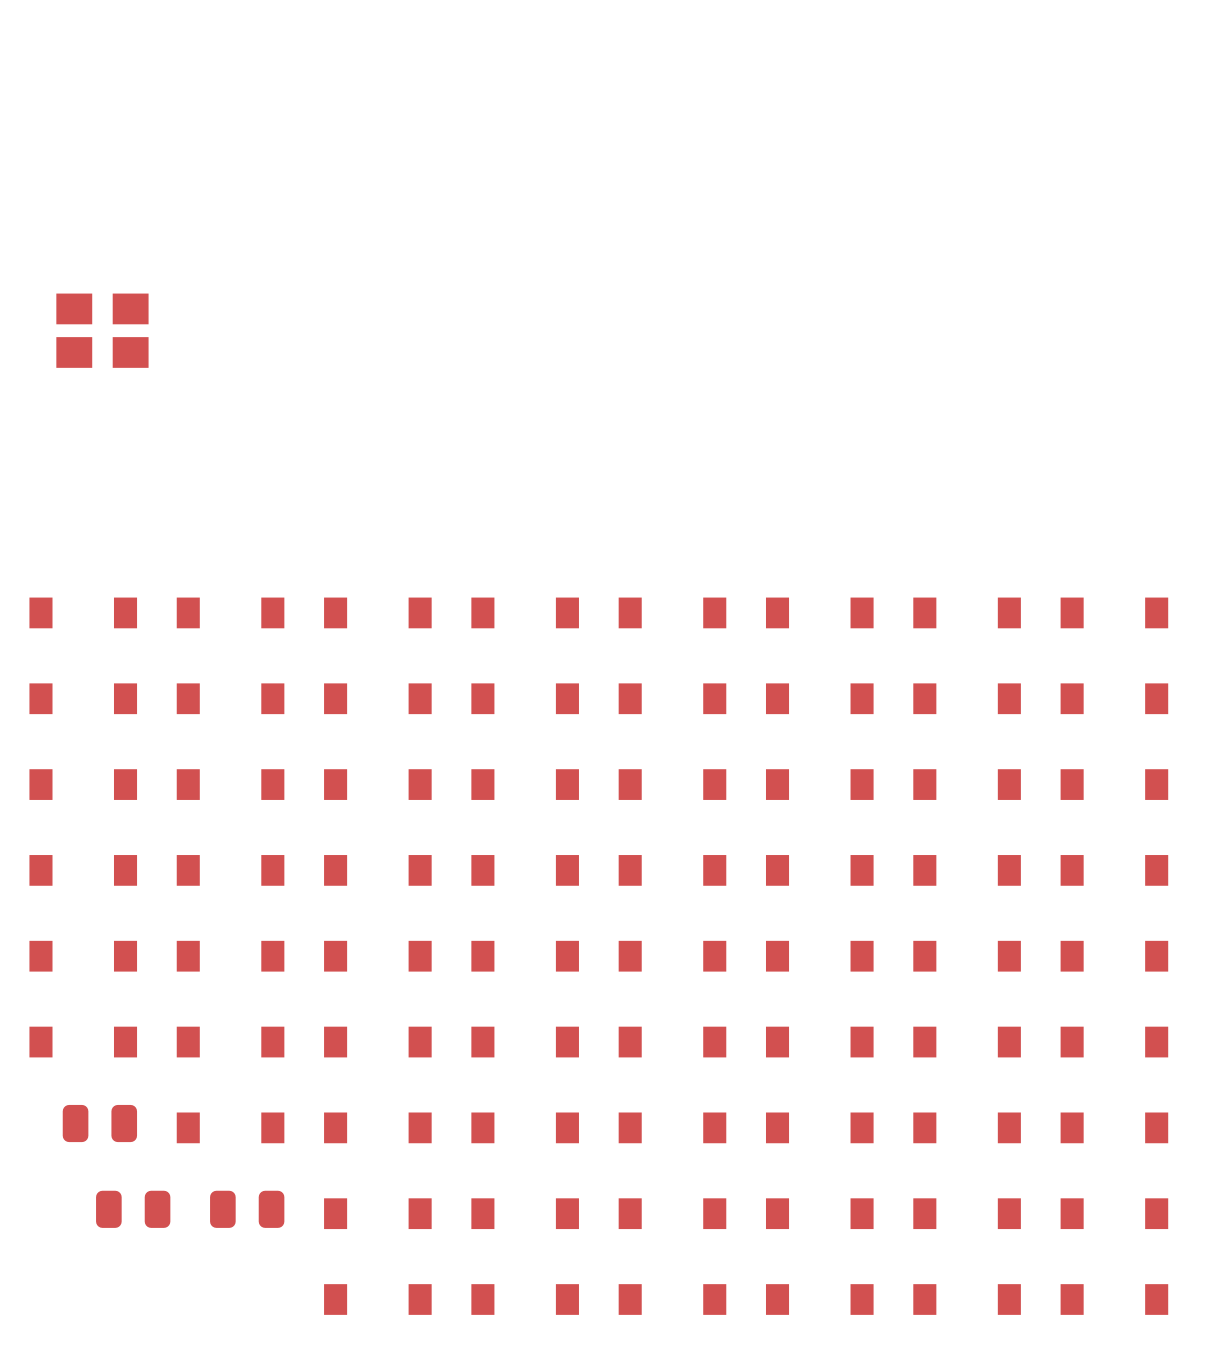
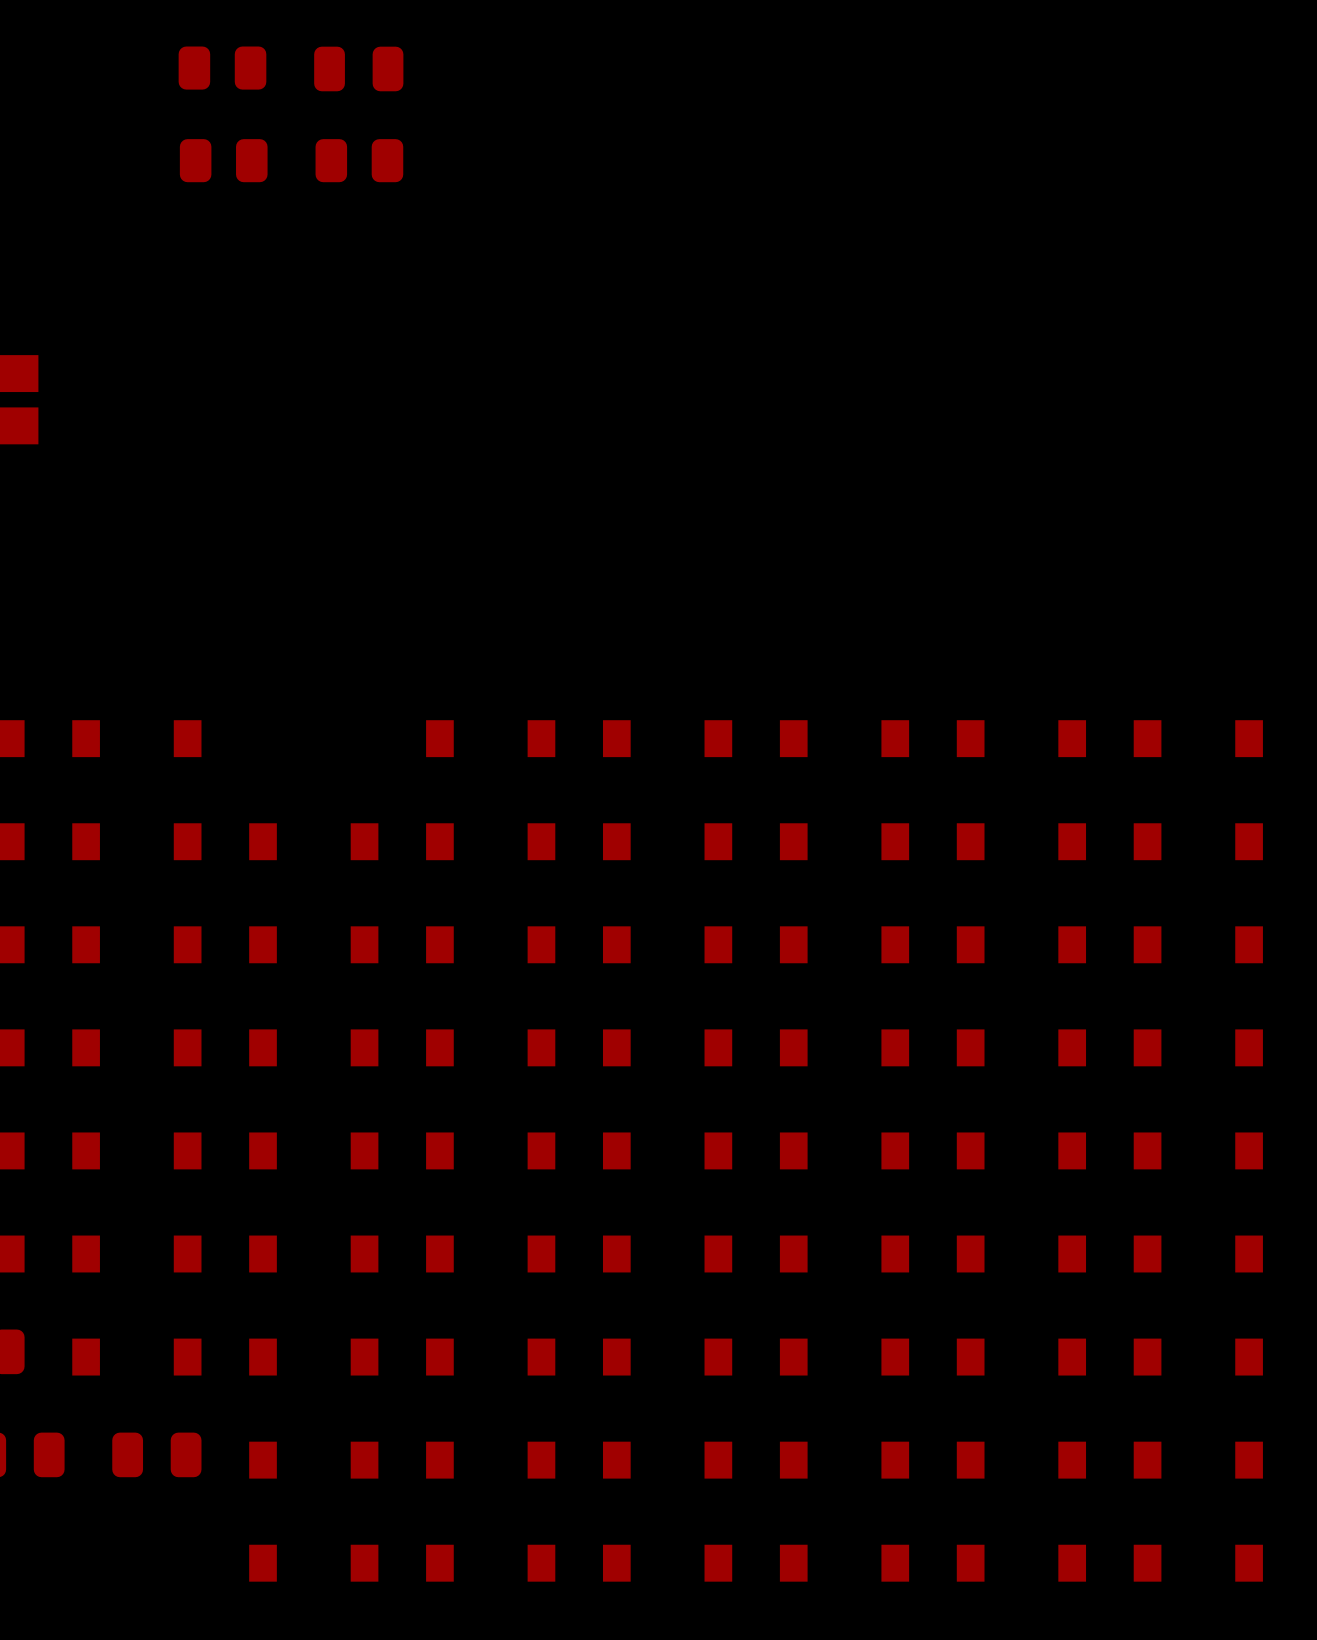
part: none -> (222, 68)
part: none -> (358, 68)
part: none -> (223, 160)
part: none -> (359, 160)
part: (377, 612) -> none

